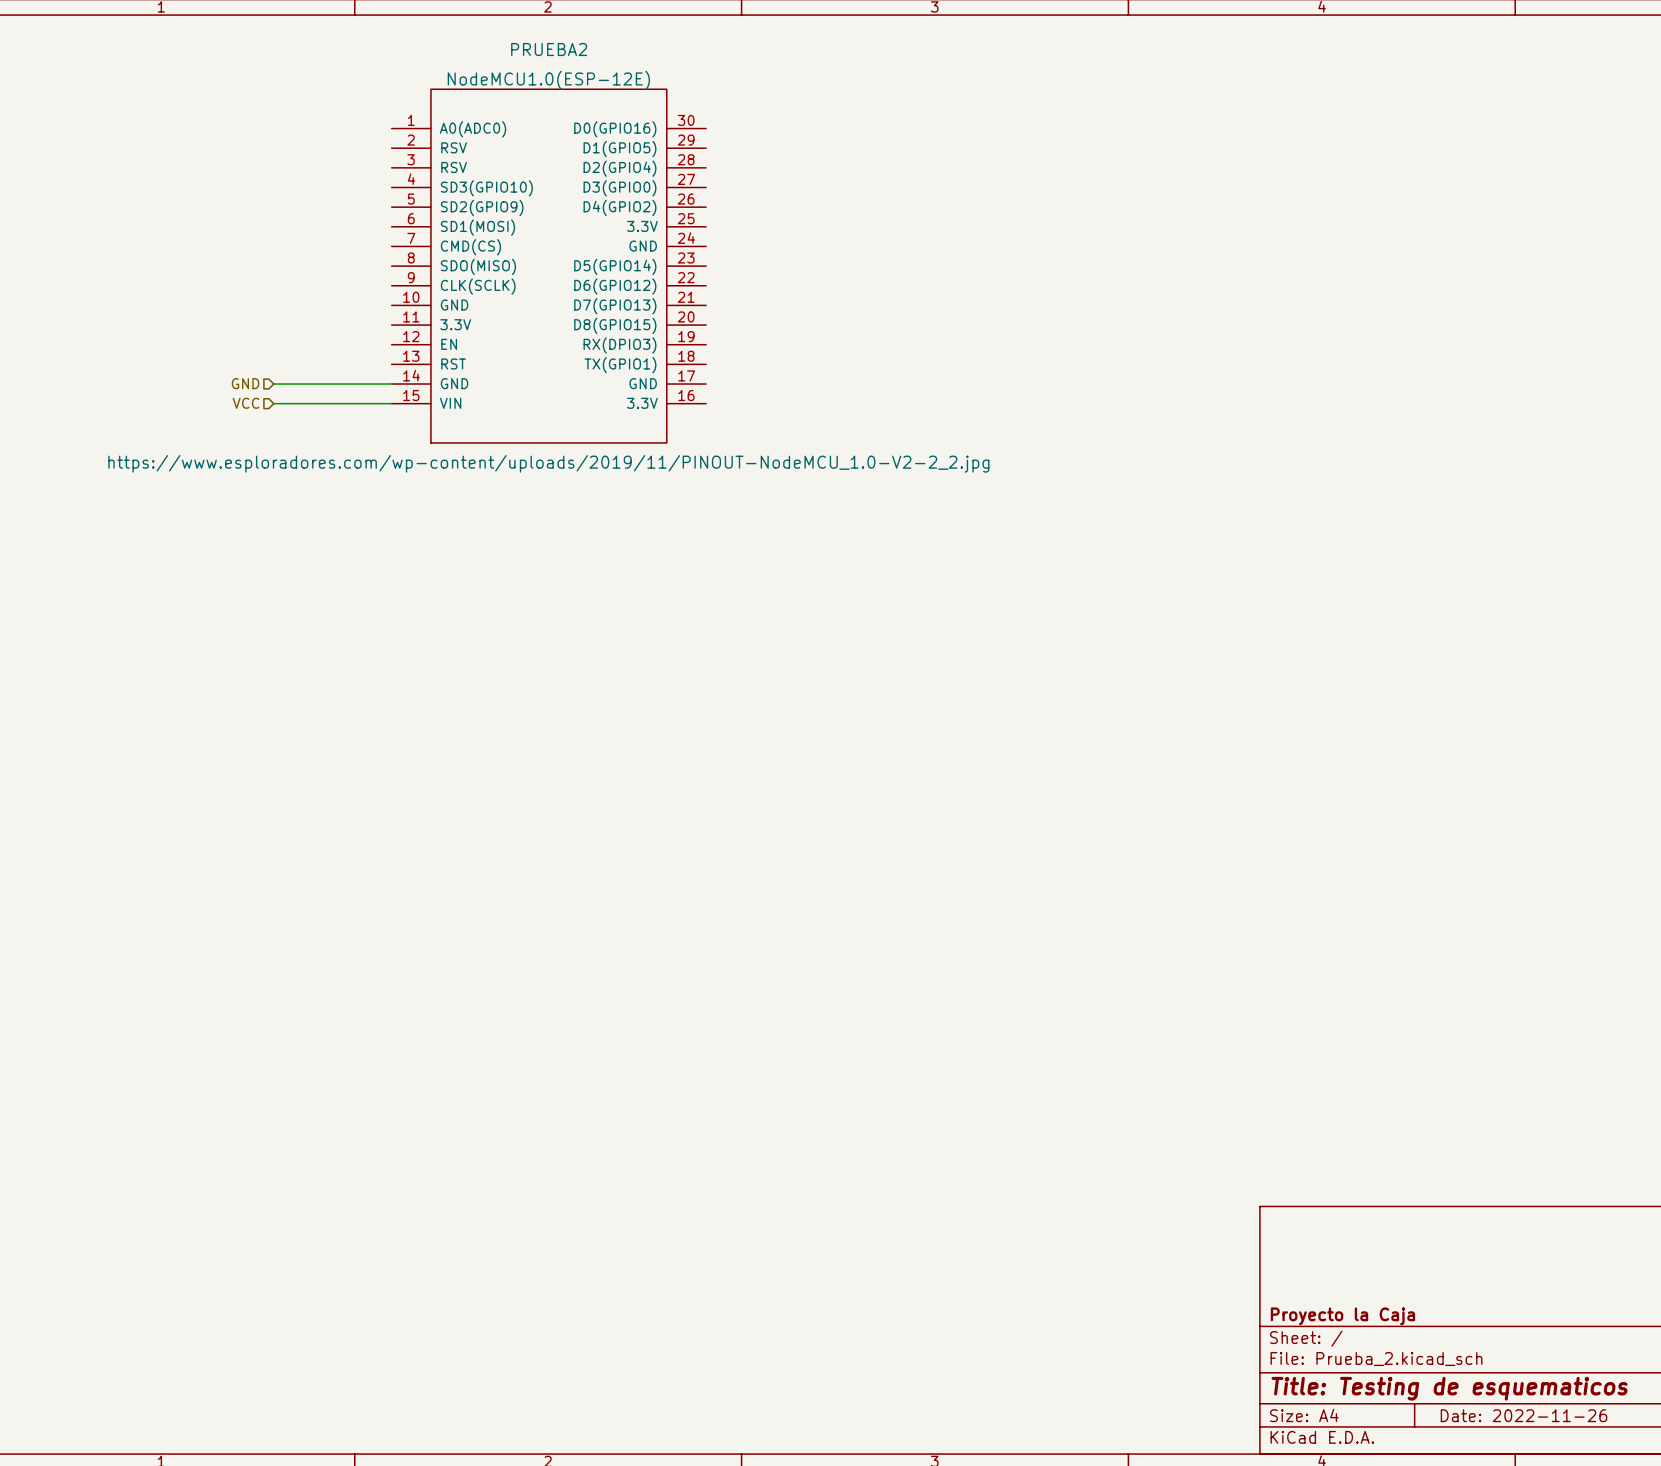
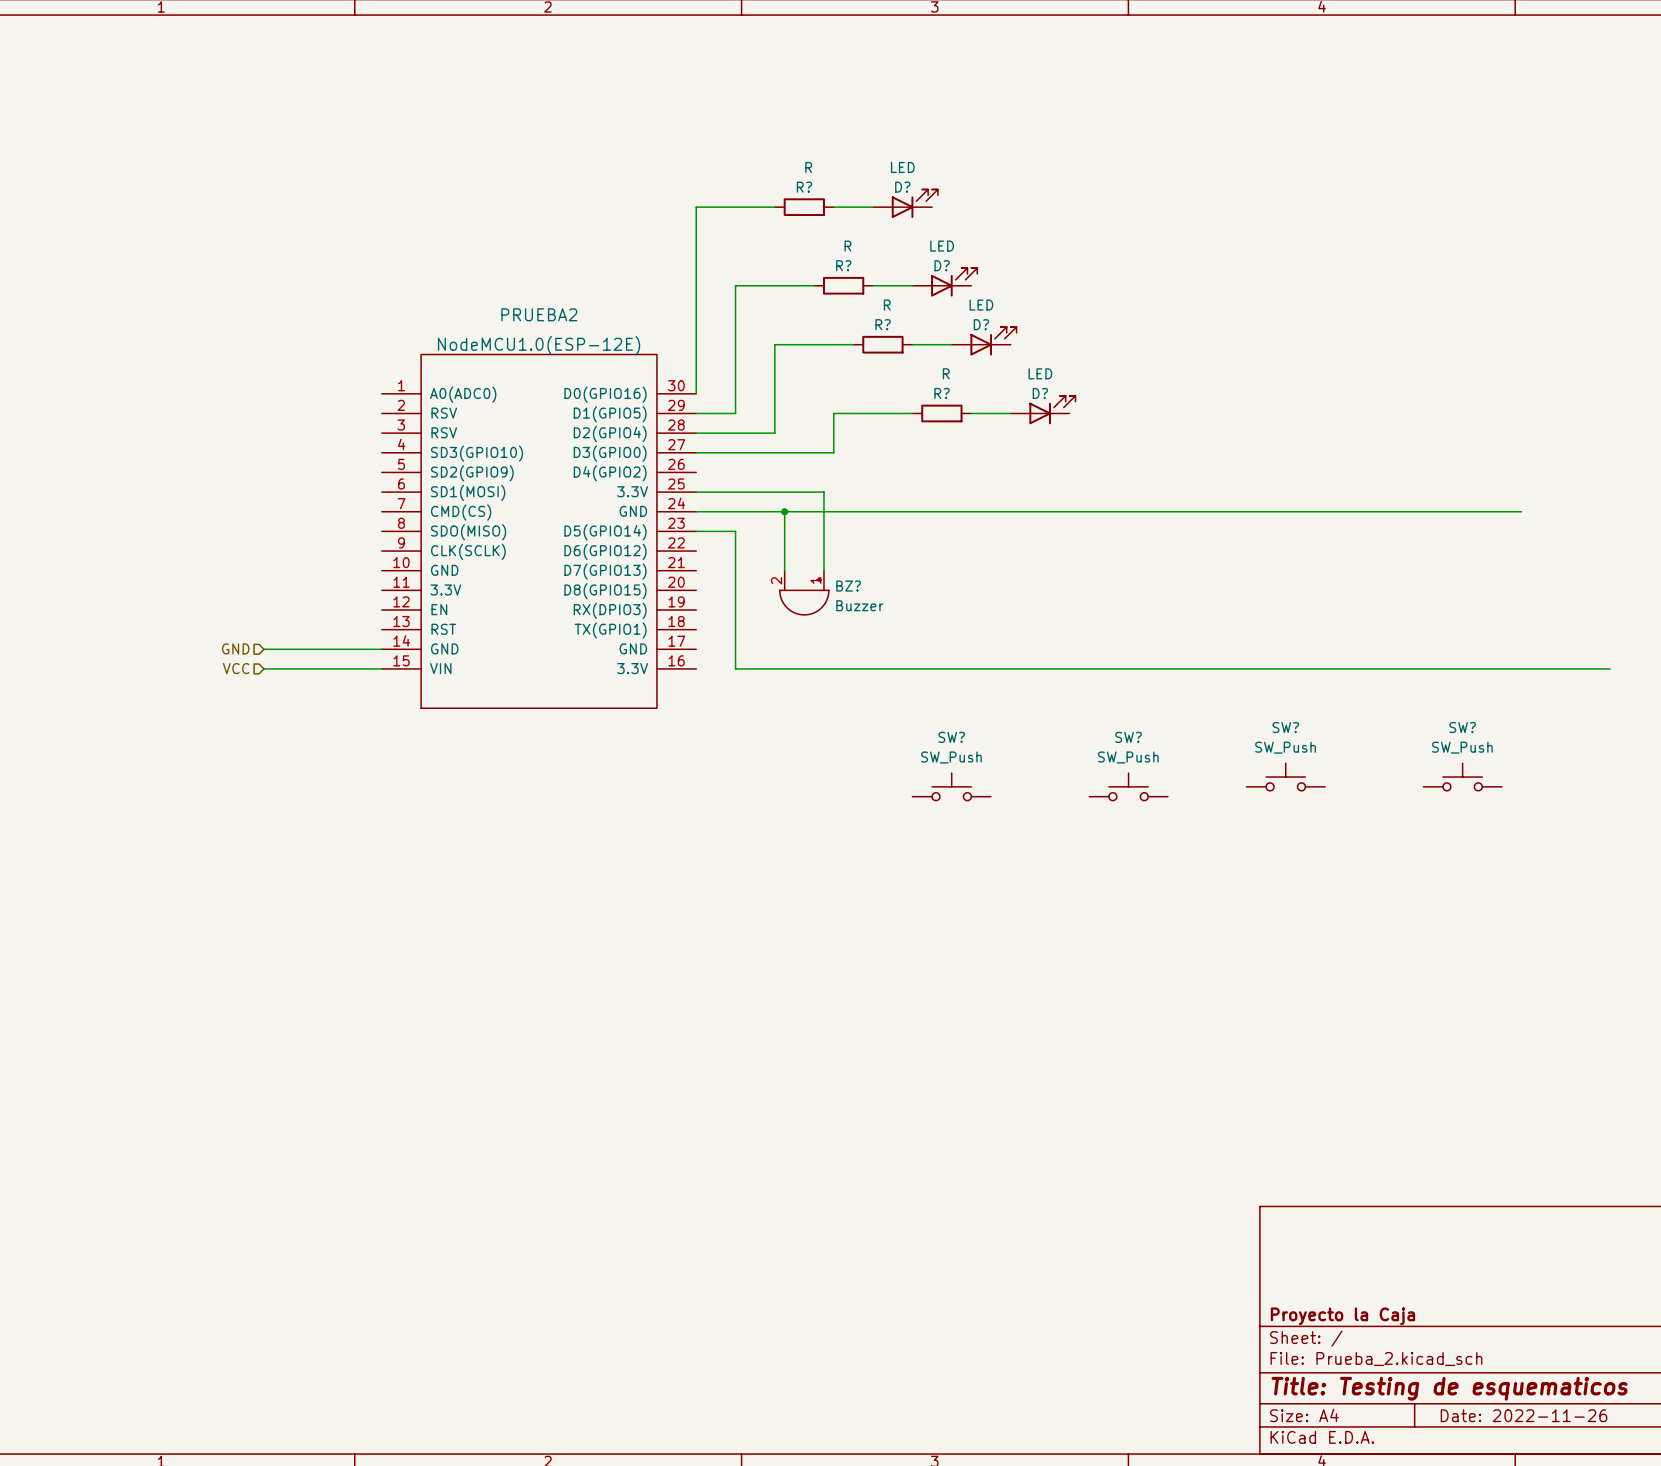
D?: none -> LED (905, 203)
wire: none -> (774, 207) (696, 207) (696, 393)
R?: none -> R (804, 207)
wire: none -> (833, 207) (873, 207)
PRUEBA2 position: (548, 266) -> (539, 531)
D?: none -> LED (944, 282)
wire: none -> (814, 285) (735, 285) (735, 413) (696, 413)
R?: none -> R (843, 285)
wire: none -> (873, 285) (912, 285)
D?: none -> LED (984, 341)
wire: none -> (853, 344) (774, 344) (774, 433) (696, 433)
R?: none -> R (882, 344)
wire: none -> (912, 344) (951, 344)
hierarchical label: GND (245, 383) -> none
wire: (273, 384) (391, 384) -> none
hierarchical label: VCC (245, 403) -> none
wire: (273, 403) (391, 403) -> none
D?: none -> LED (1043, 410)
wire: none -> (912, 413) (833, 413) (833, 452) (696, 452)
R?: none -> R (941, 413)
wire: none -> (971, 413) (1010, 413)
PRUEBA2 text: https://www.esploradores.com/wp-content/uploads/2019/11/PINOUT-NodeMCU_1.0-V2-2_2.jpg (548, 463) -> none
wire: none -> (696, 492) (823, 492) (823, 570)
wire: none -> (696, 511) (1521, 511)
wire: none -> (784, 511) (784, 570)
junction: none -> (784, 511)
wire: none -> (696, 531) (735, 531) (735, 668) (1610, 668)
BZ?: none -> Buzzer (804, 592)
hierarchical label: none -> GND (235, 648)
wire: none -> (263, 649) (381, 649)
hierarchical label: none -> VCC (236, 668)
wire: none -> (263, 668) (381, 668)
SW?: none -> SW_Push (1285, 777)
SW?: none -> SW_Push (1462, 777)
SW?: none -> SW_Push (951, 786)
SW?: none -> SW_Push (1128, 786)

